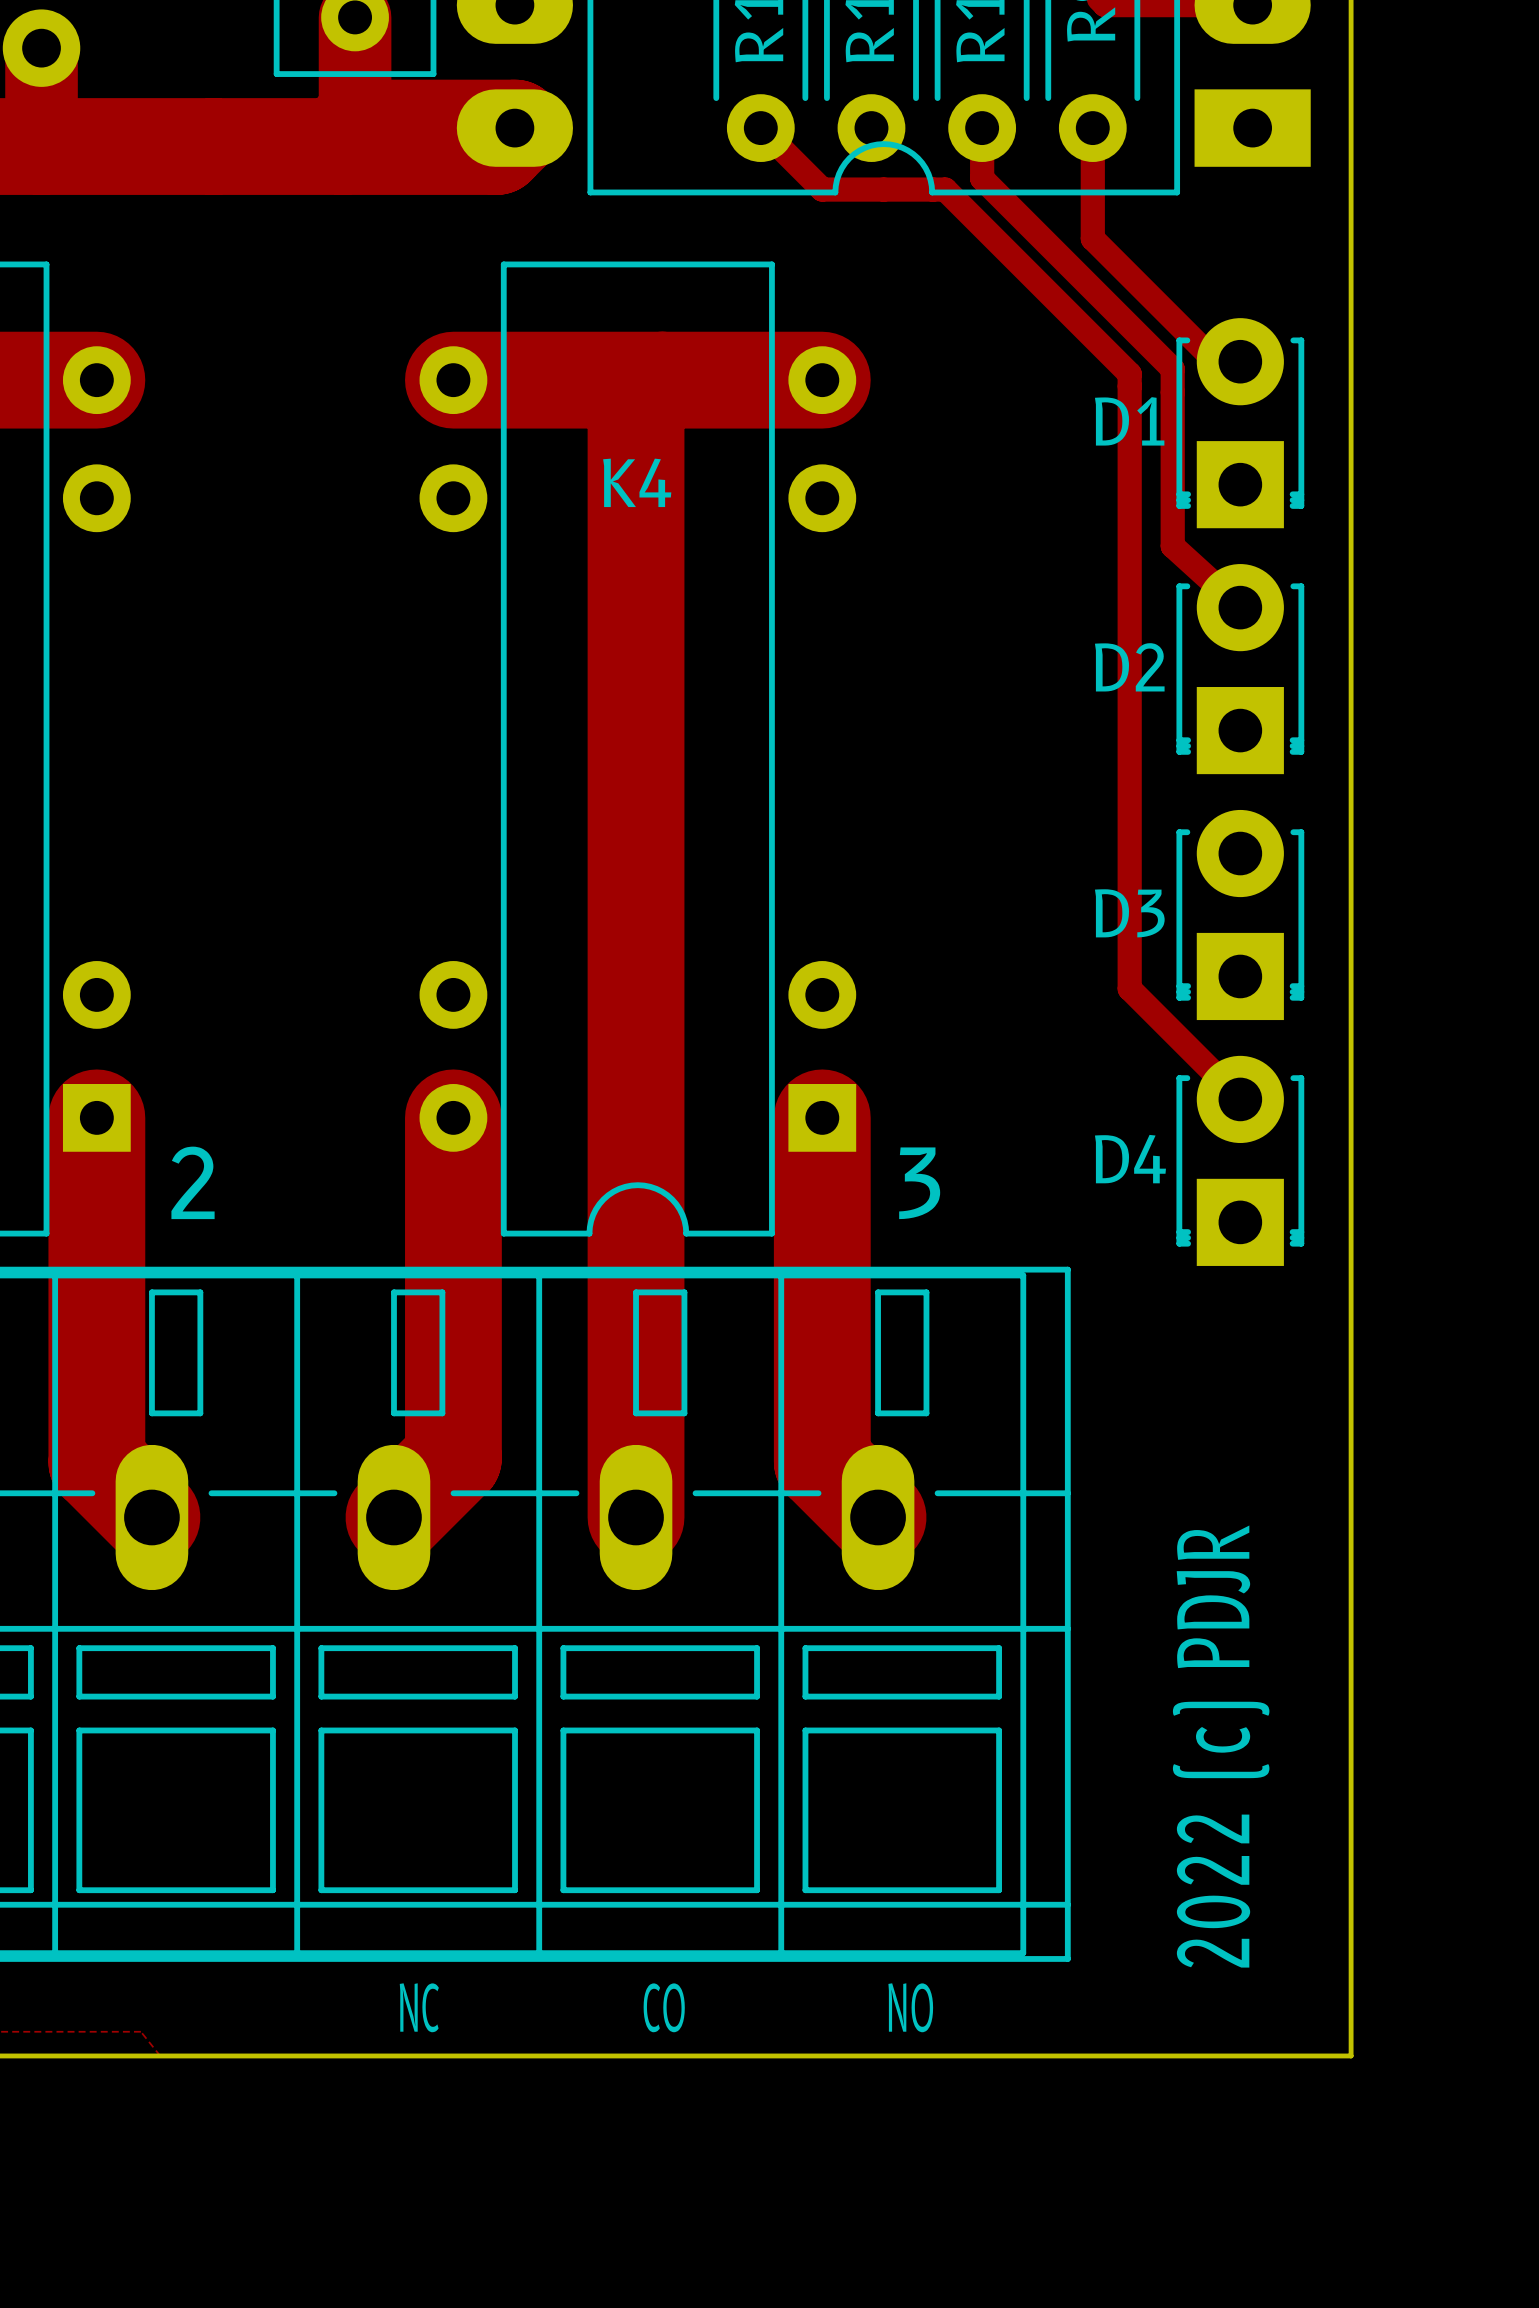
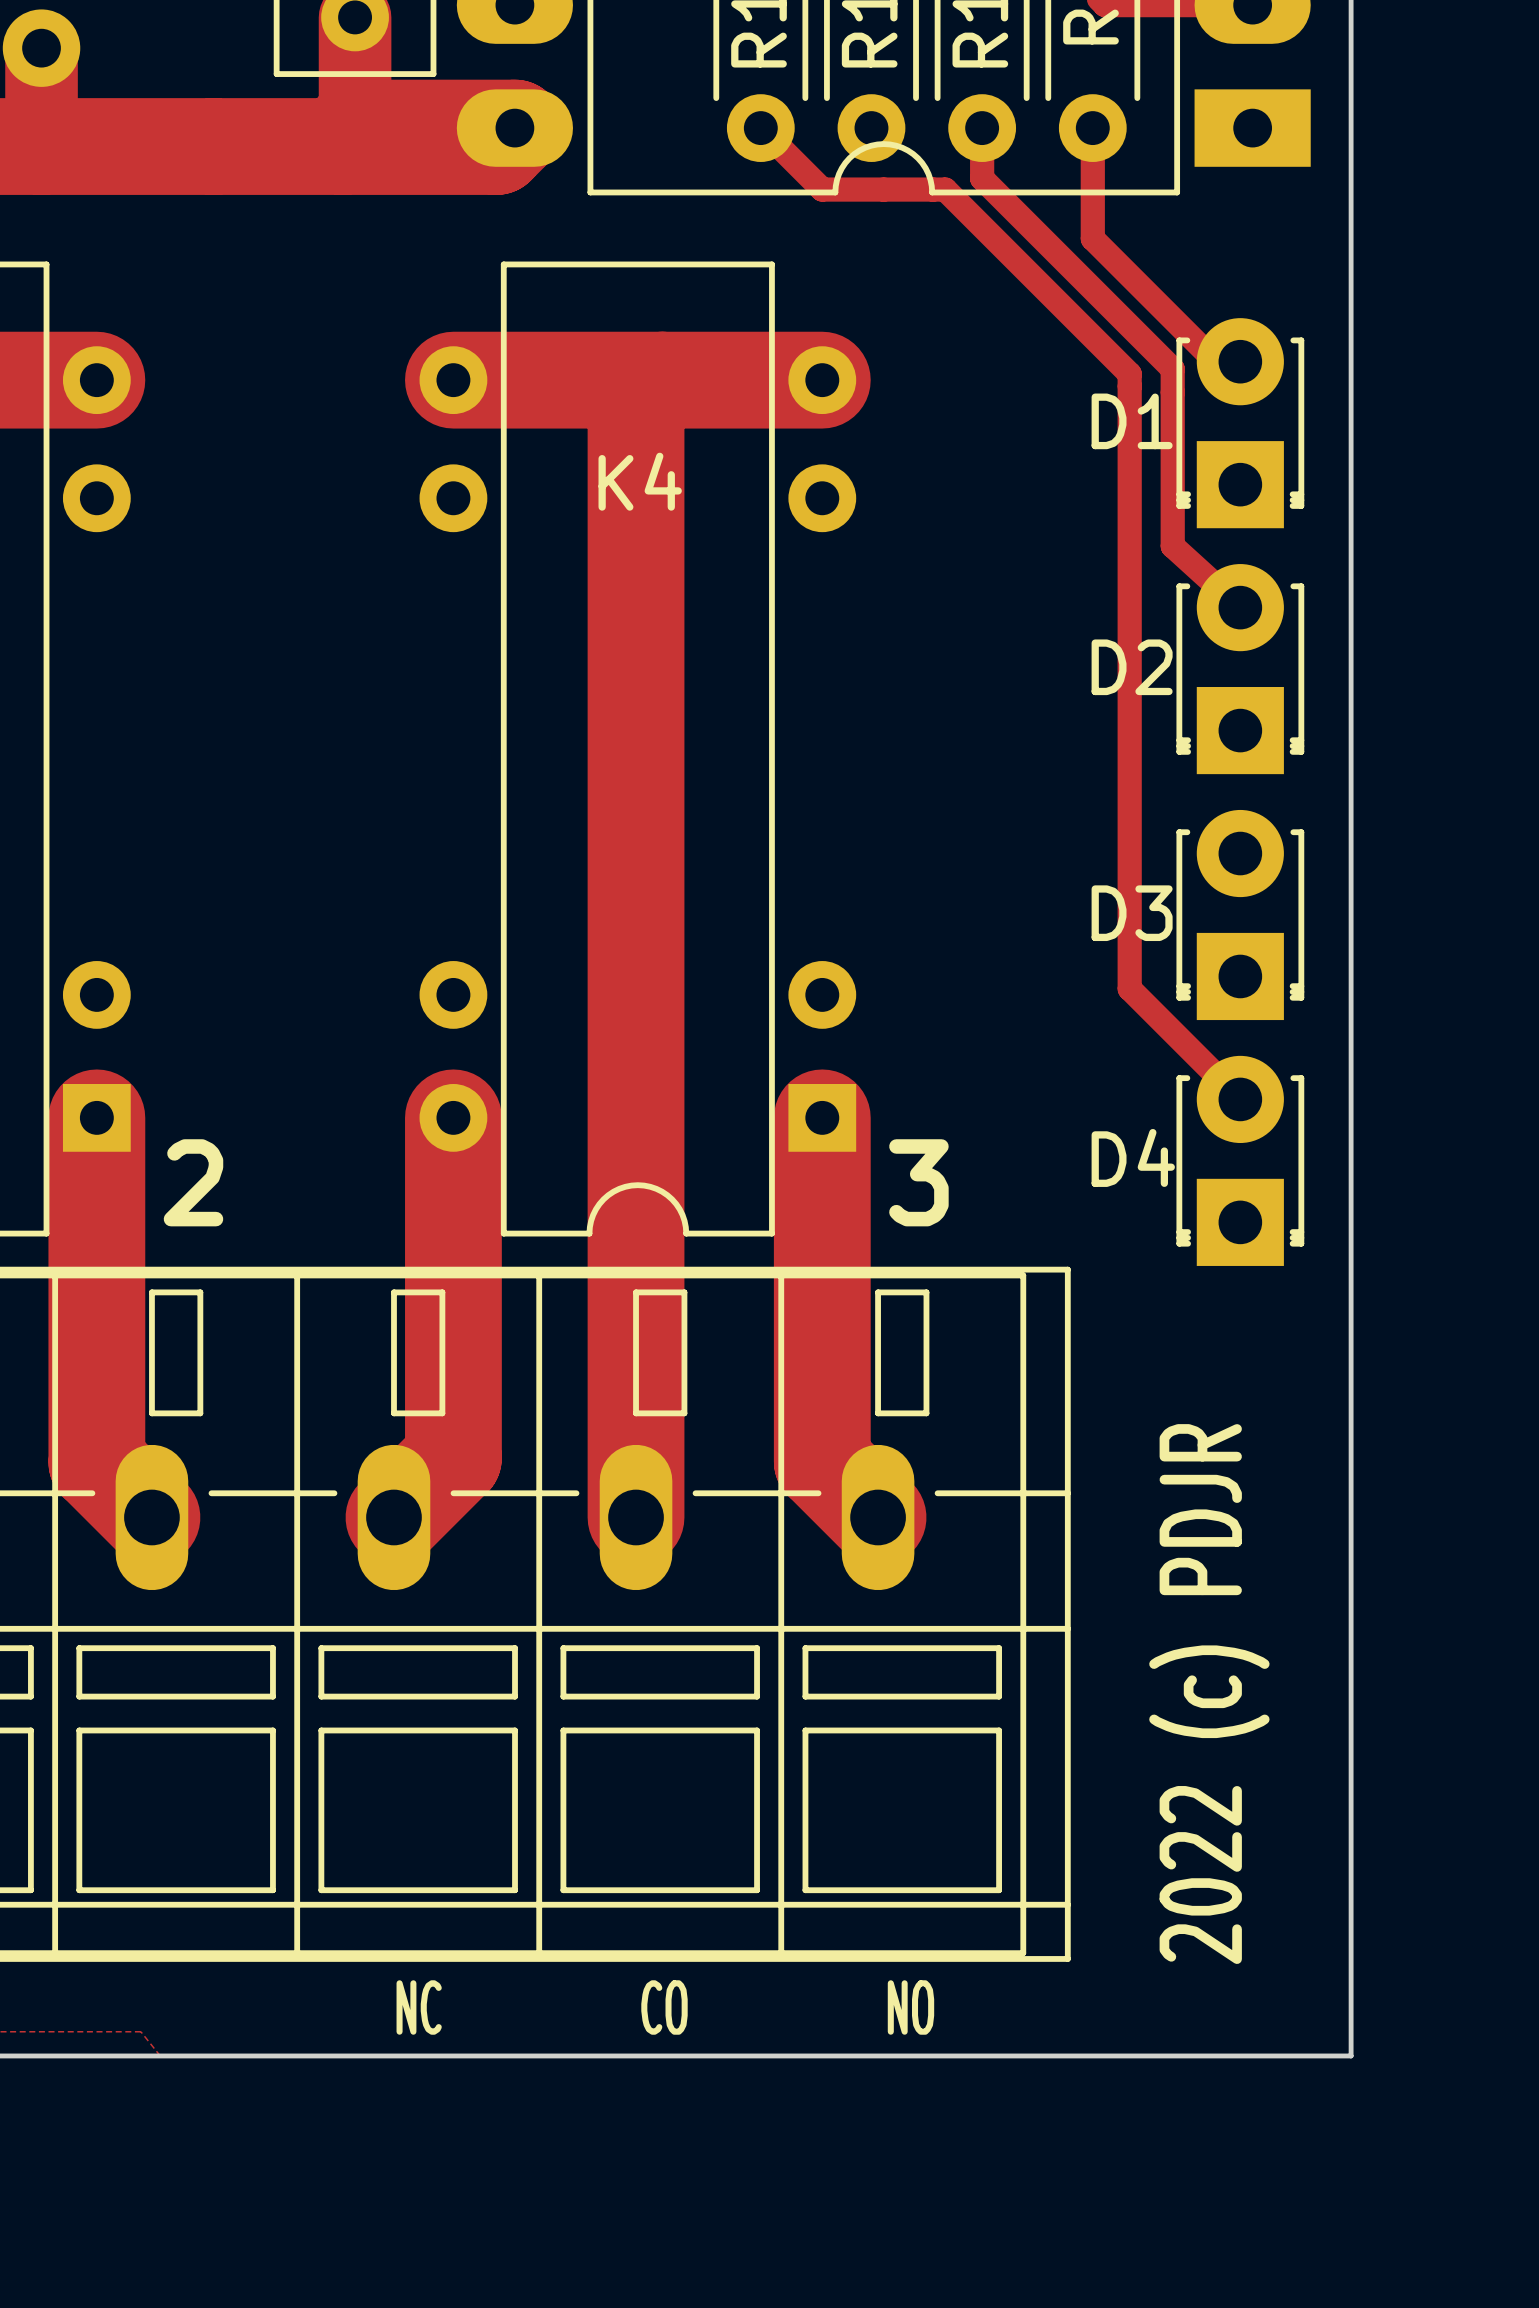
text position: 2022 (c) PDJR (1221, 1746) -> 2022 (c) PDJR (1209, 1694)

